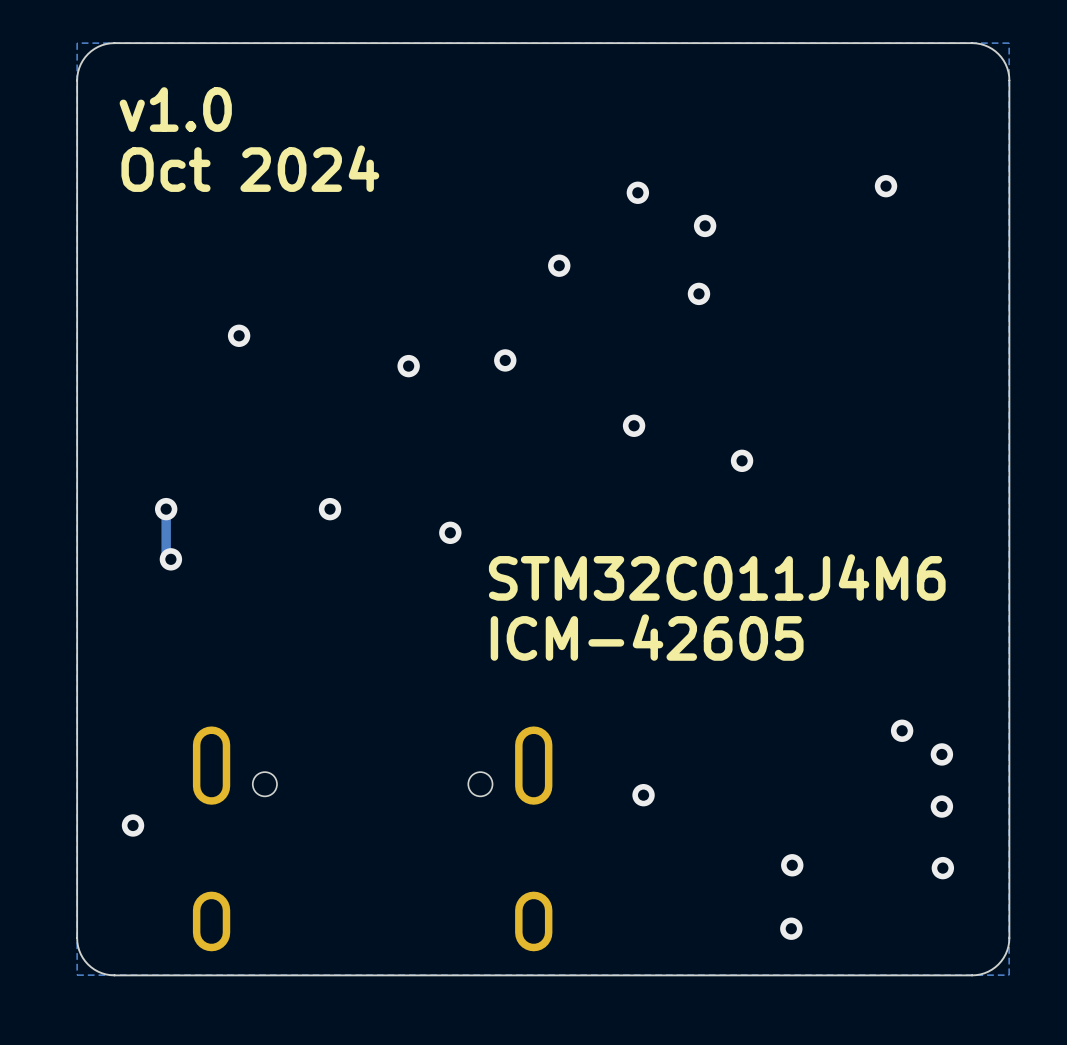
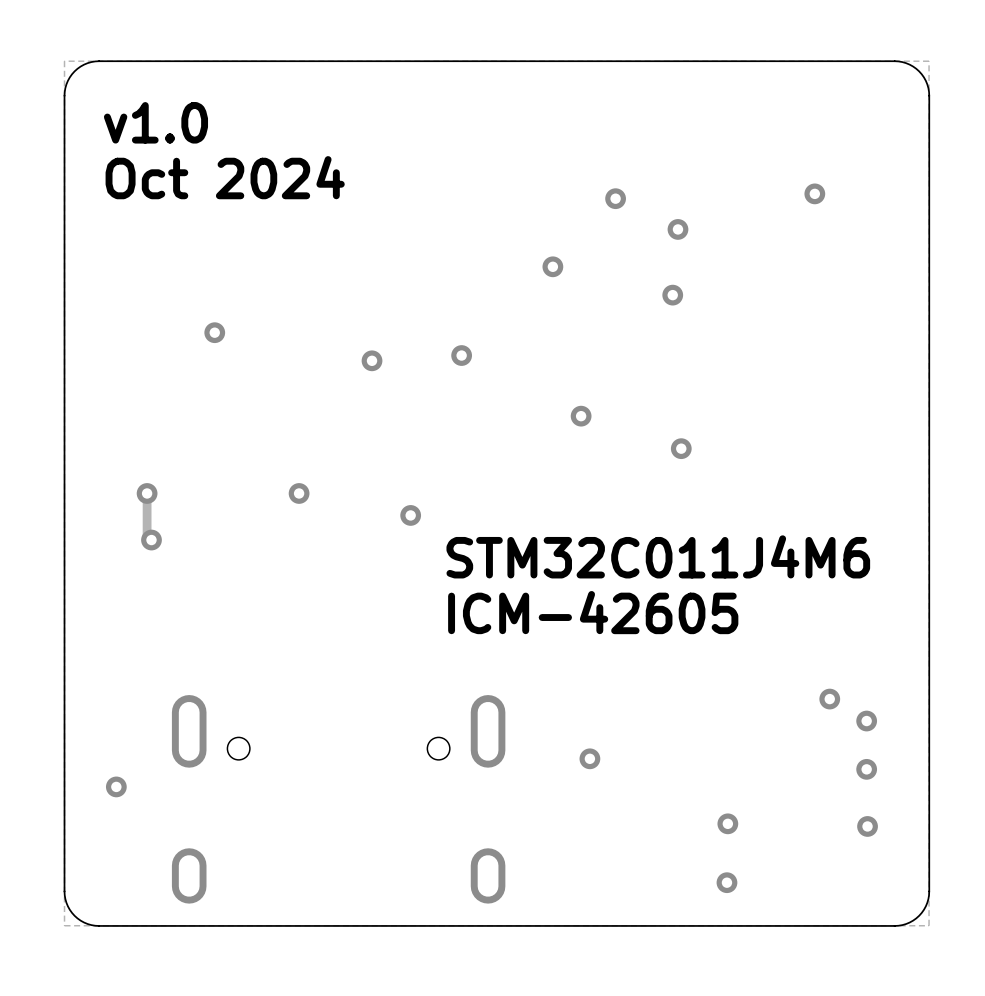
via: none -> (615, 198)
via: (637, 192) -> none
via: none -> (677, 229)
via: (705, 225) -> none
via: none -> (552, 266)
via: (559, 265) -> none
via position: (698, 293) -> (672, 295)

